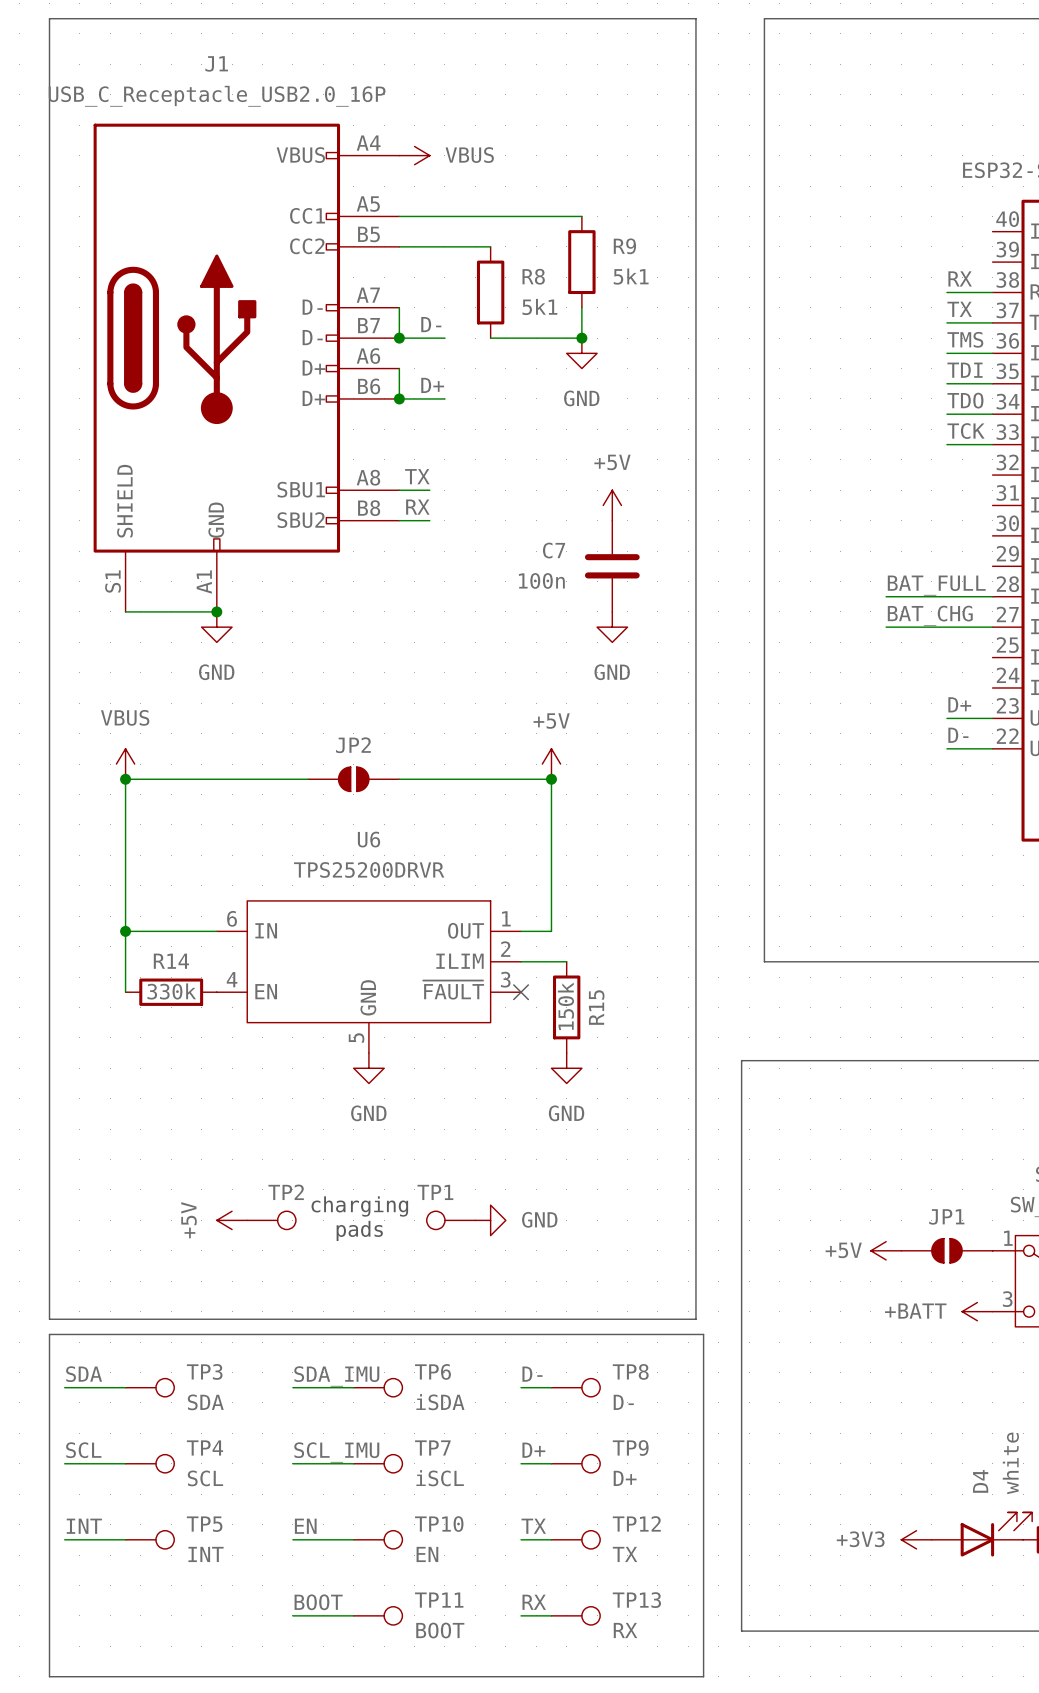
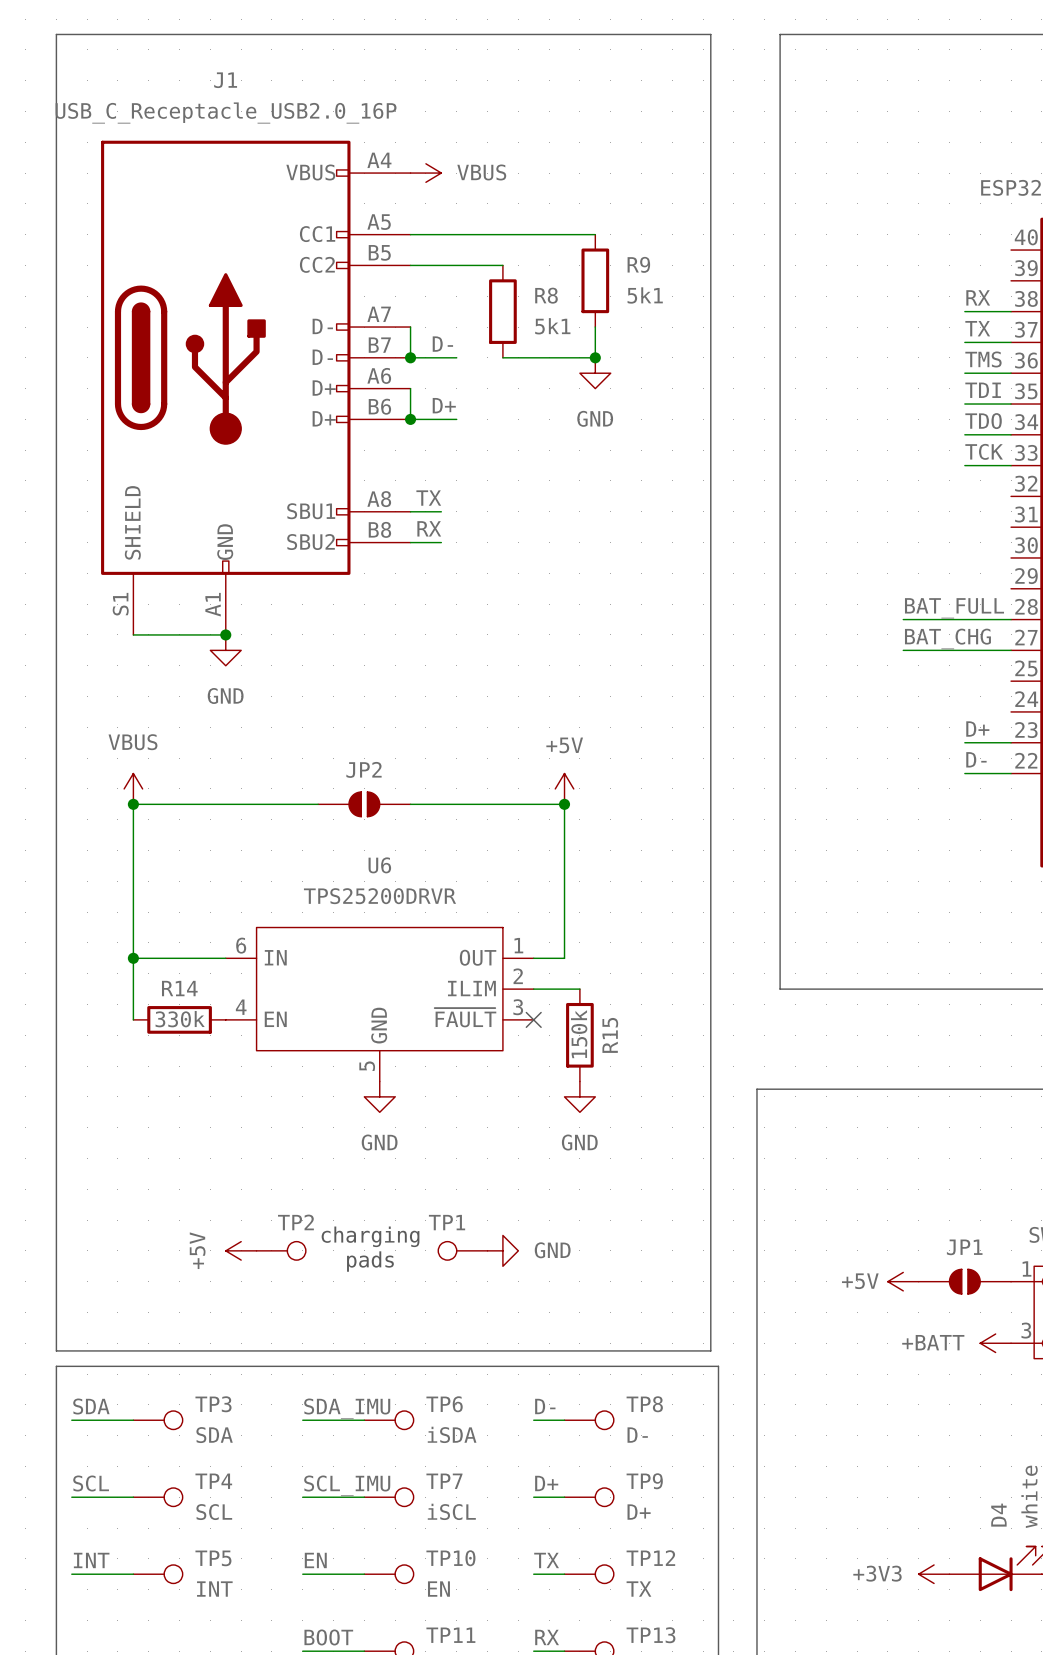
power symbol: +5V (612, 505) -> none
C7: 100n (612, 566) -> none
power symbol: GND (612, 627) -> none

